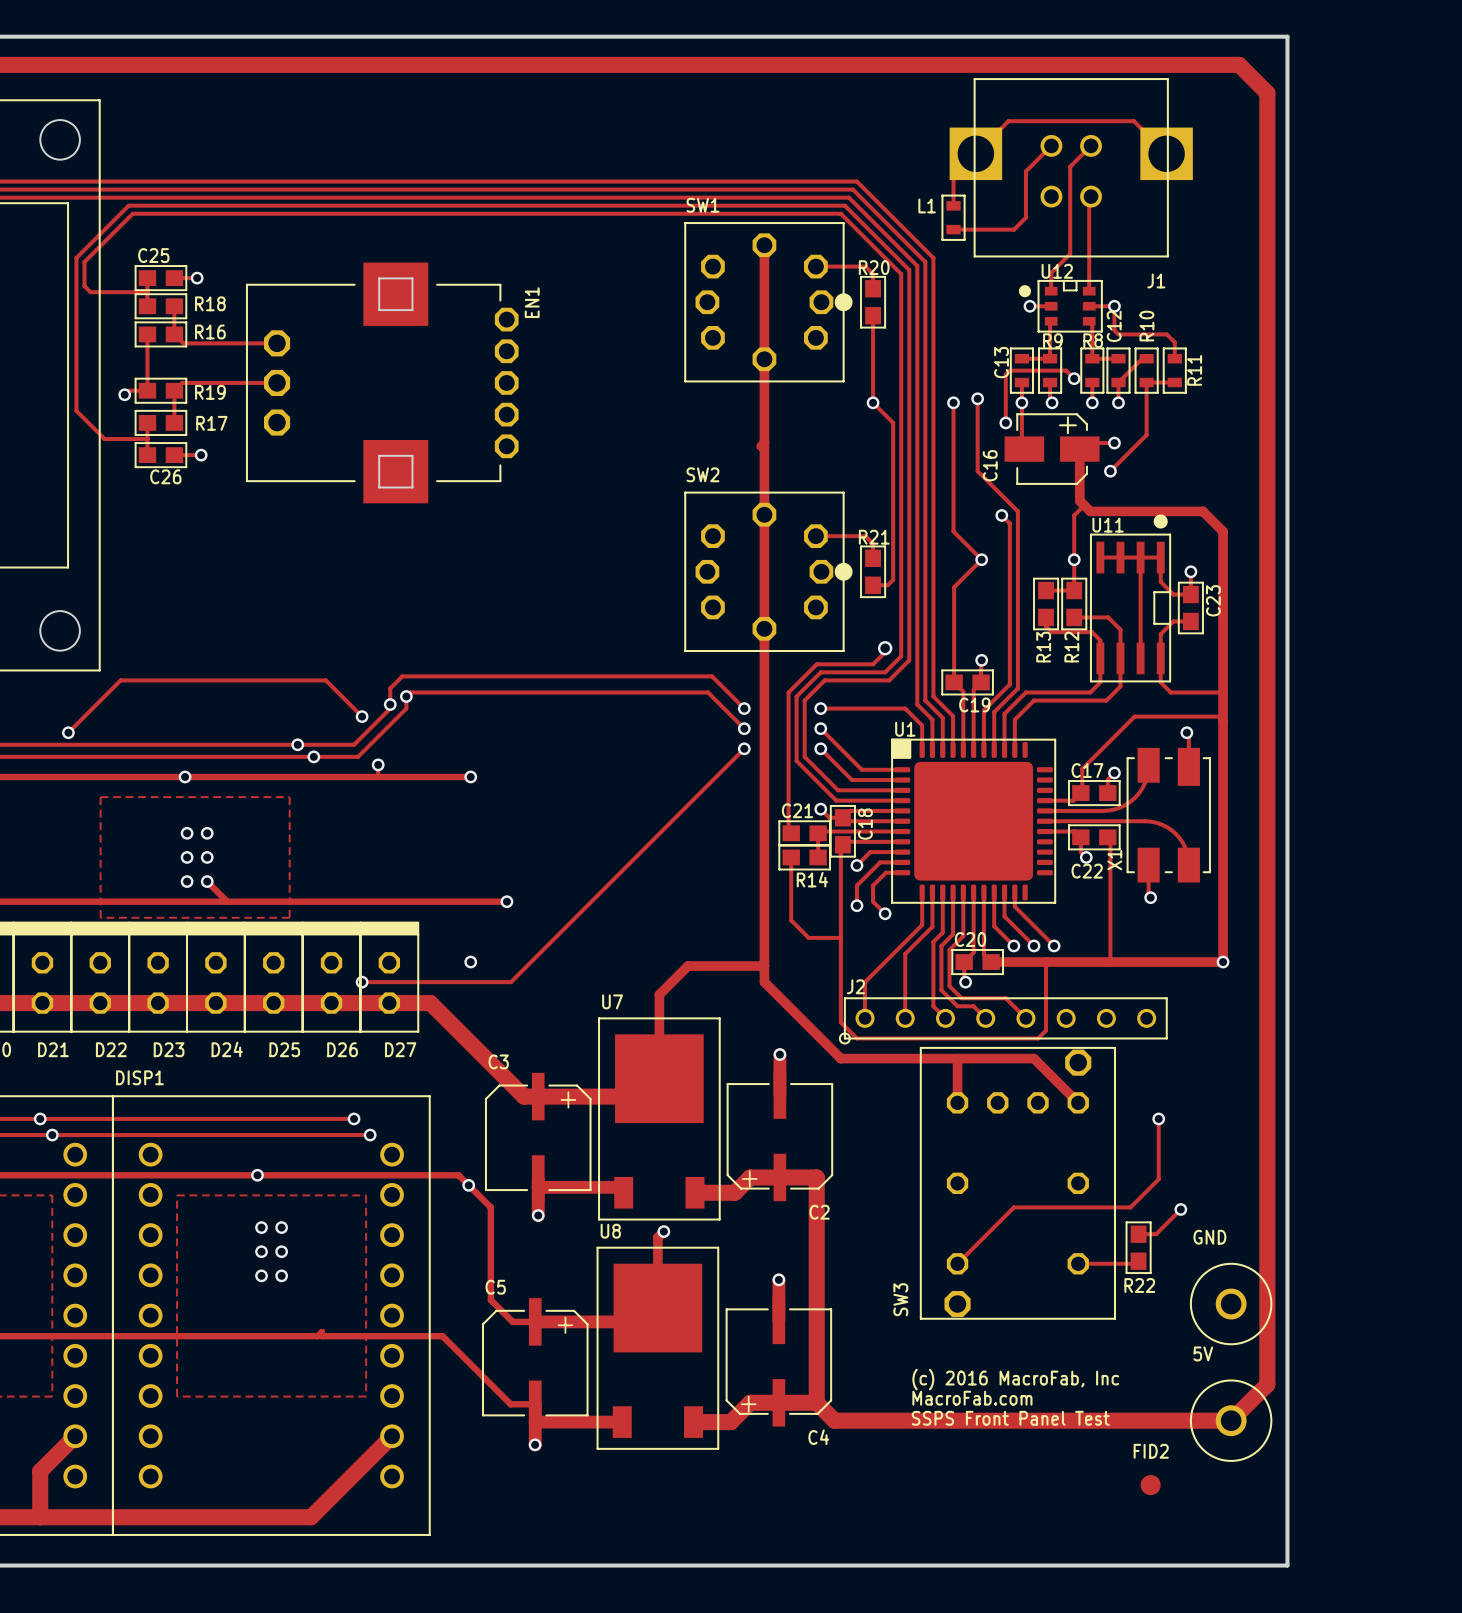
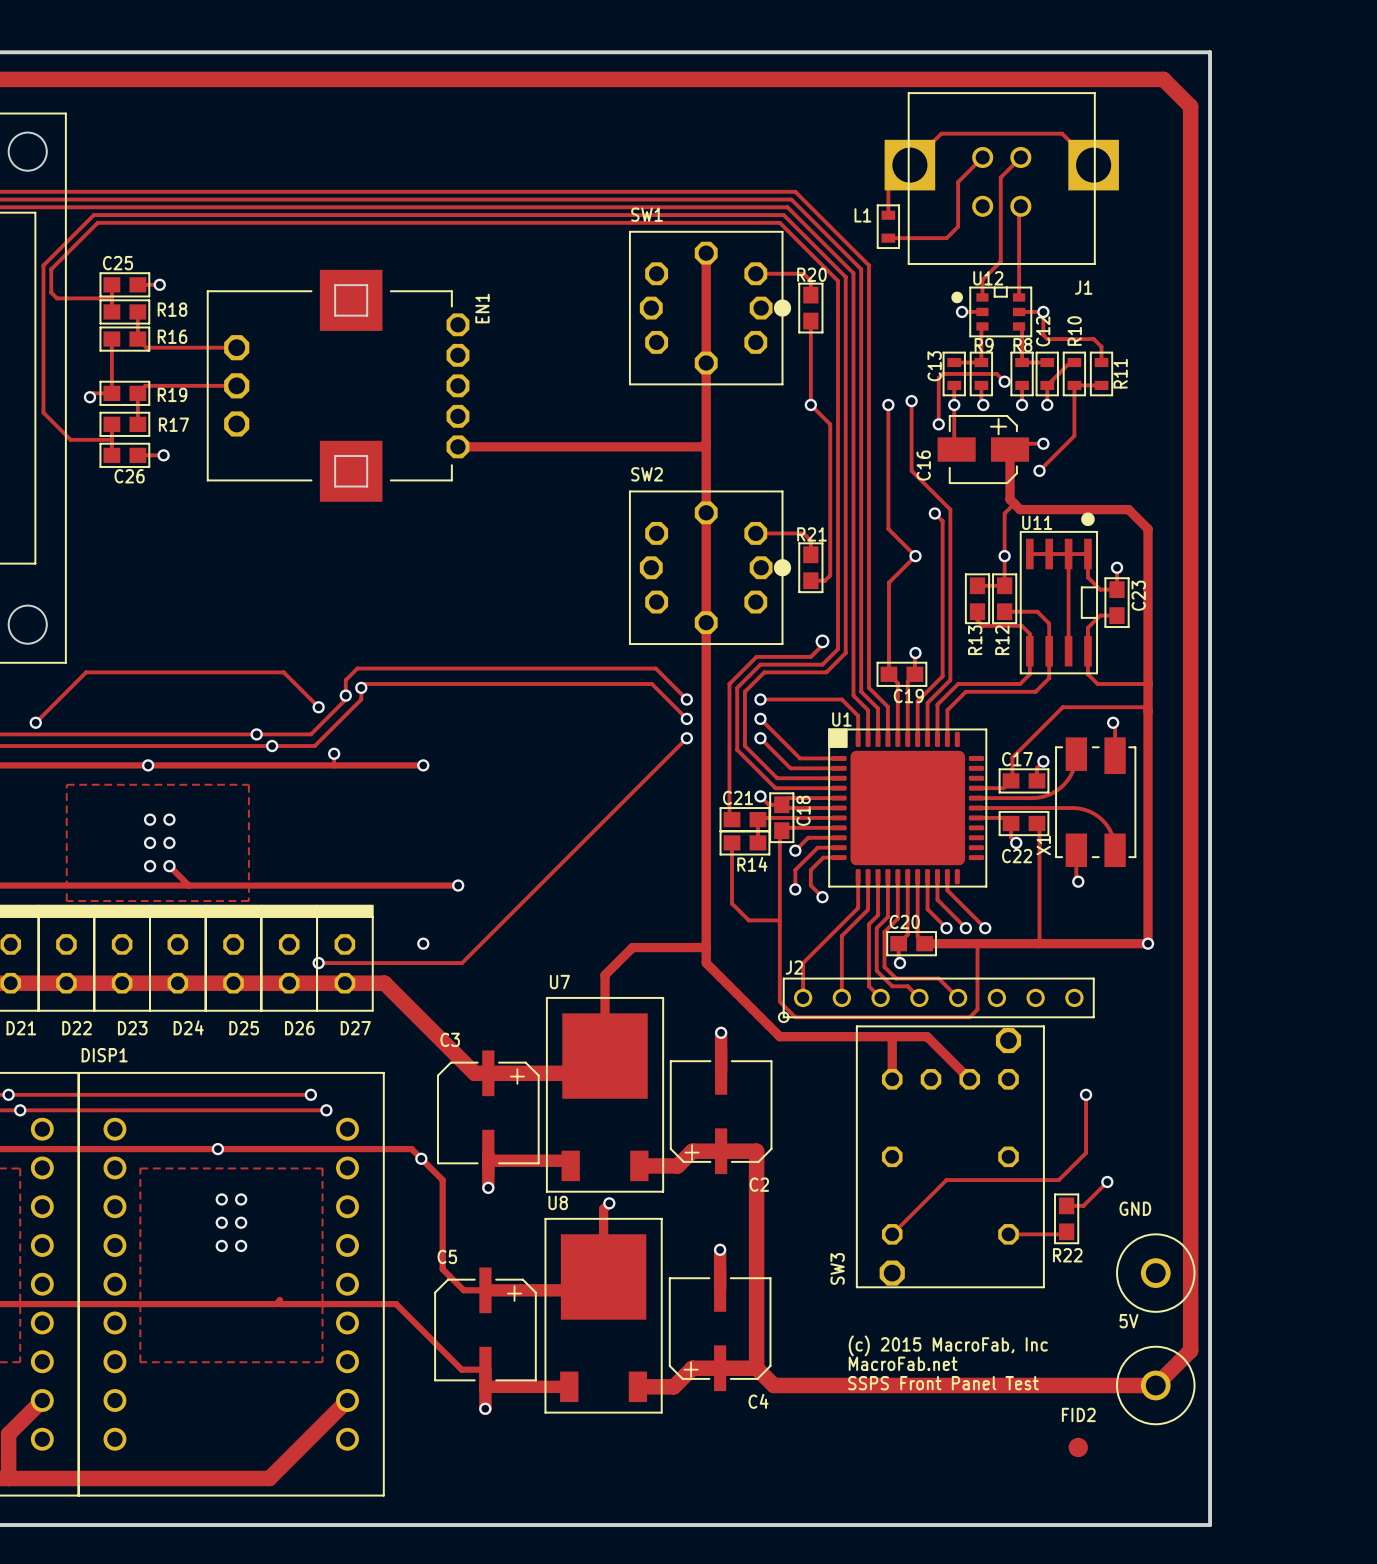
track: none -> (457, 446) (703, 446)
track: (993, 1058) (1033, 1058) (1078, 1102) -> (927, 1036) (969, 1079)
drawing shape: [911, 1368, 1120, 1426] -> [848, 1335, 1048, 1391]

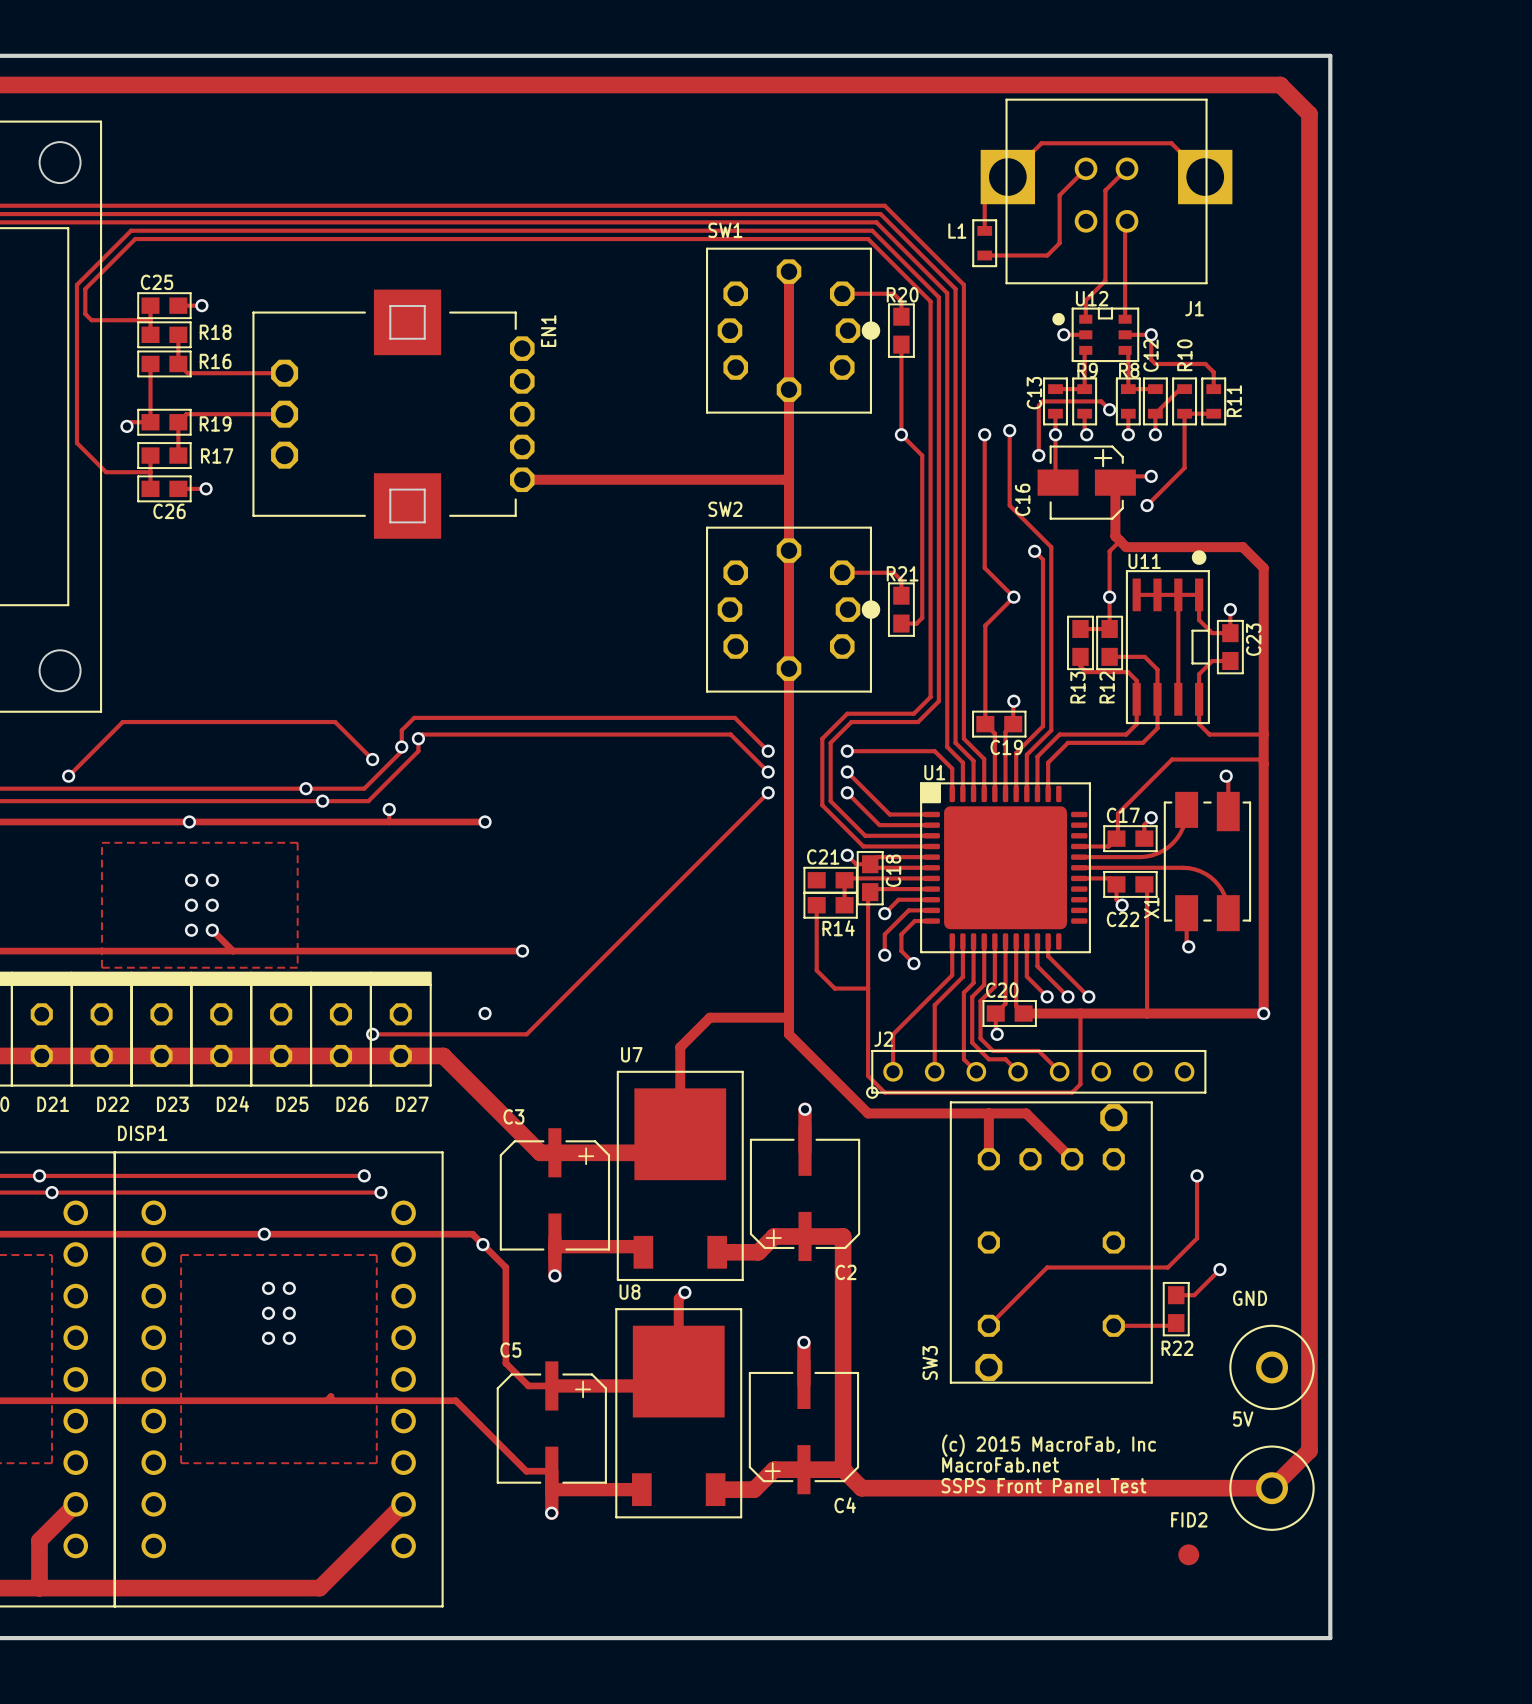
track: (822, 641) (822, 645) (810, 656) (756, 656) (729, 684) (729, 819) (732, 819) -> none
via: (822, 641) -> none

